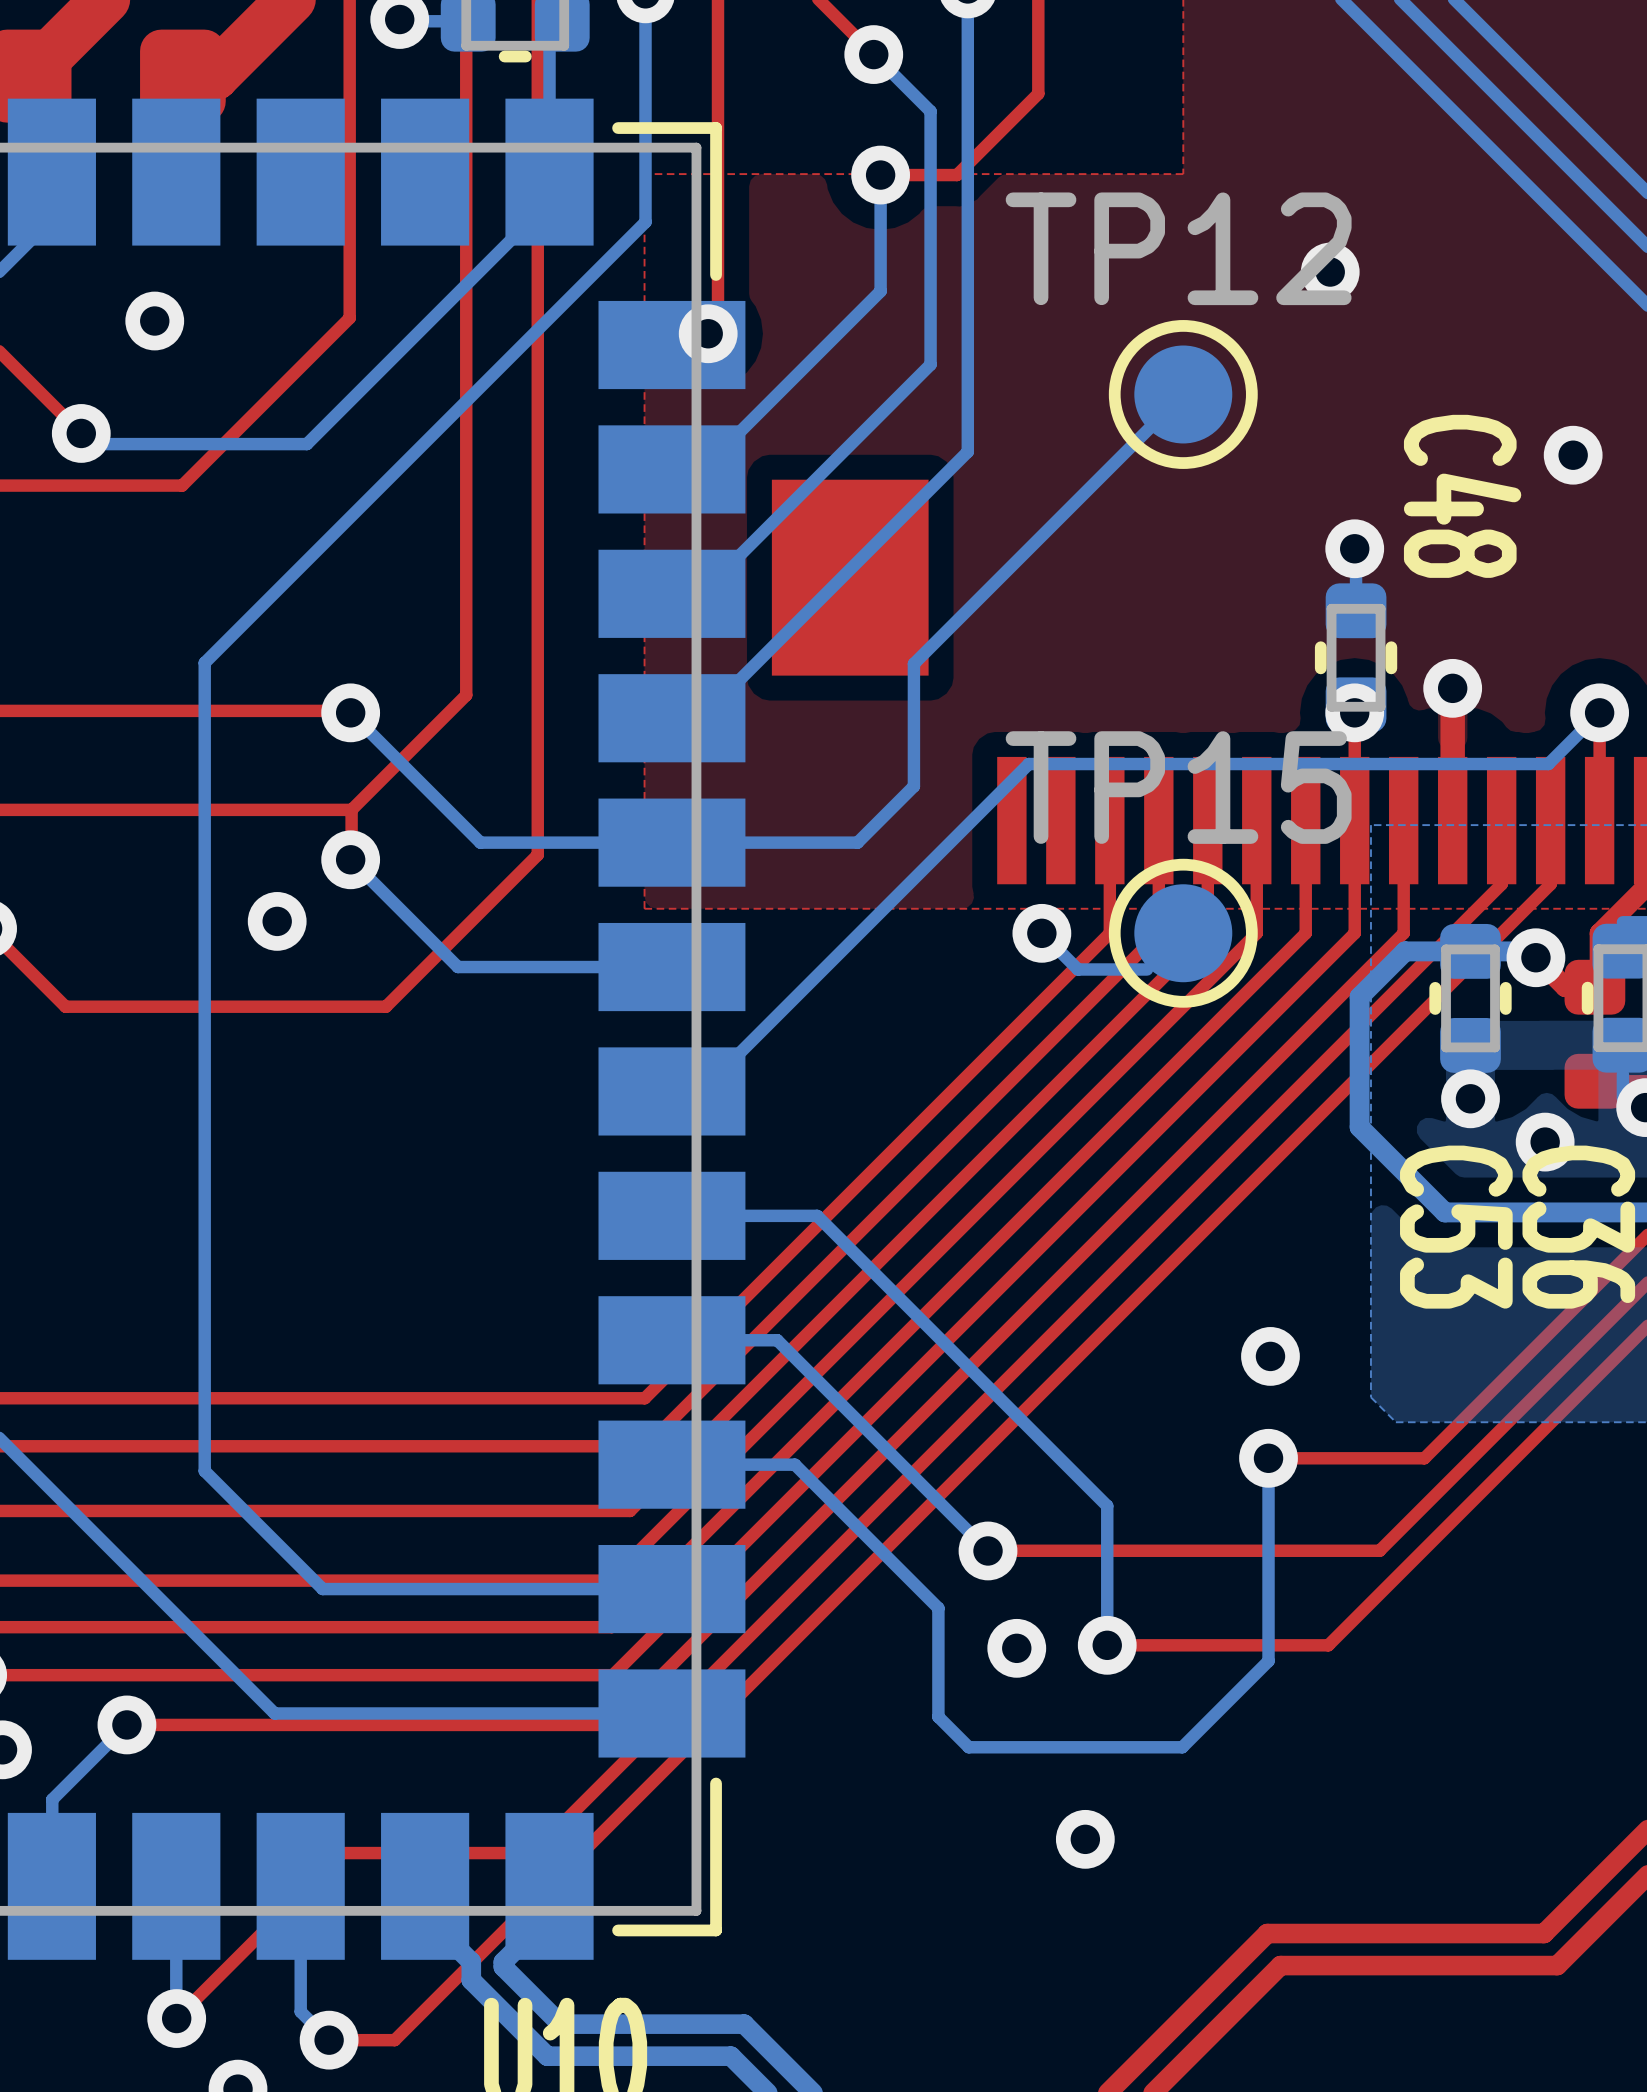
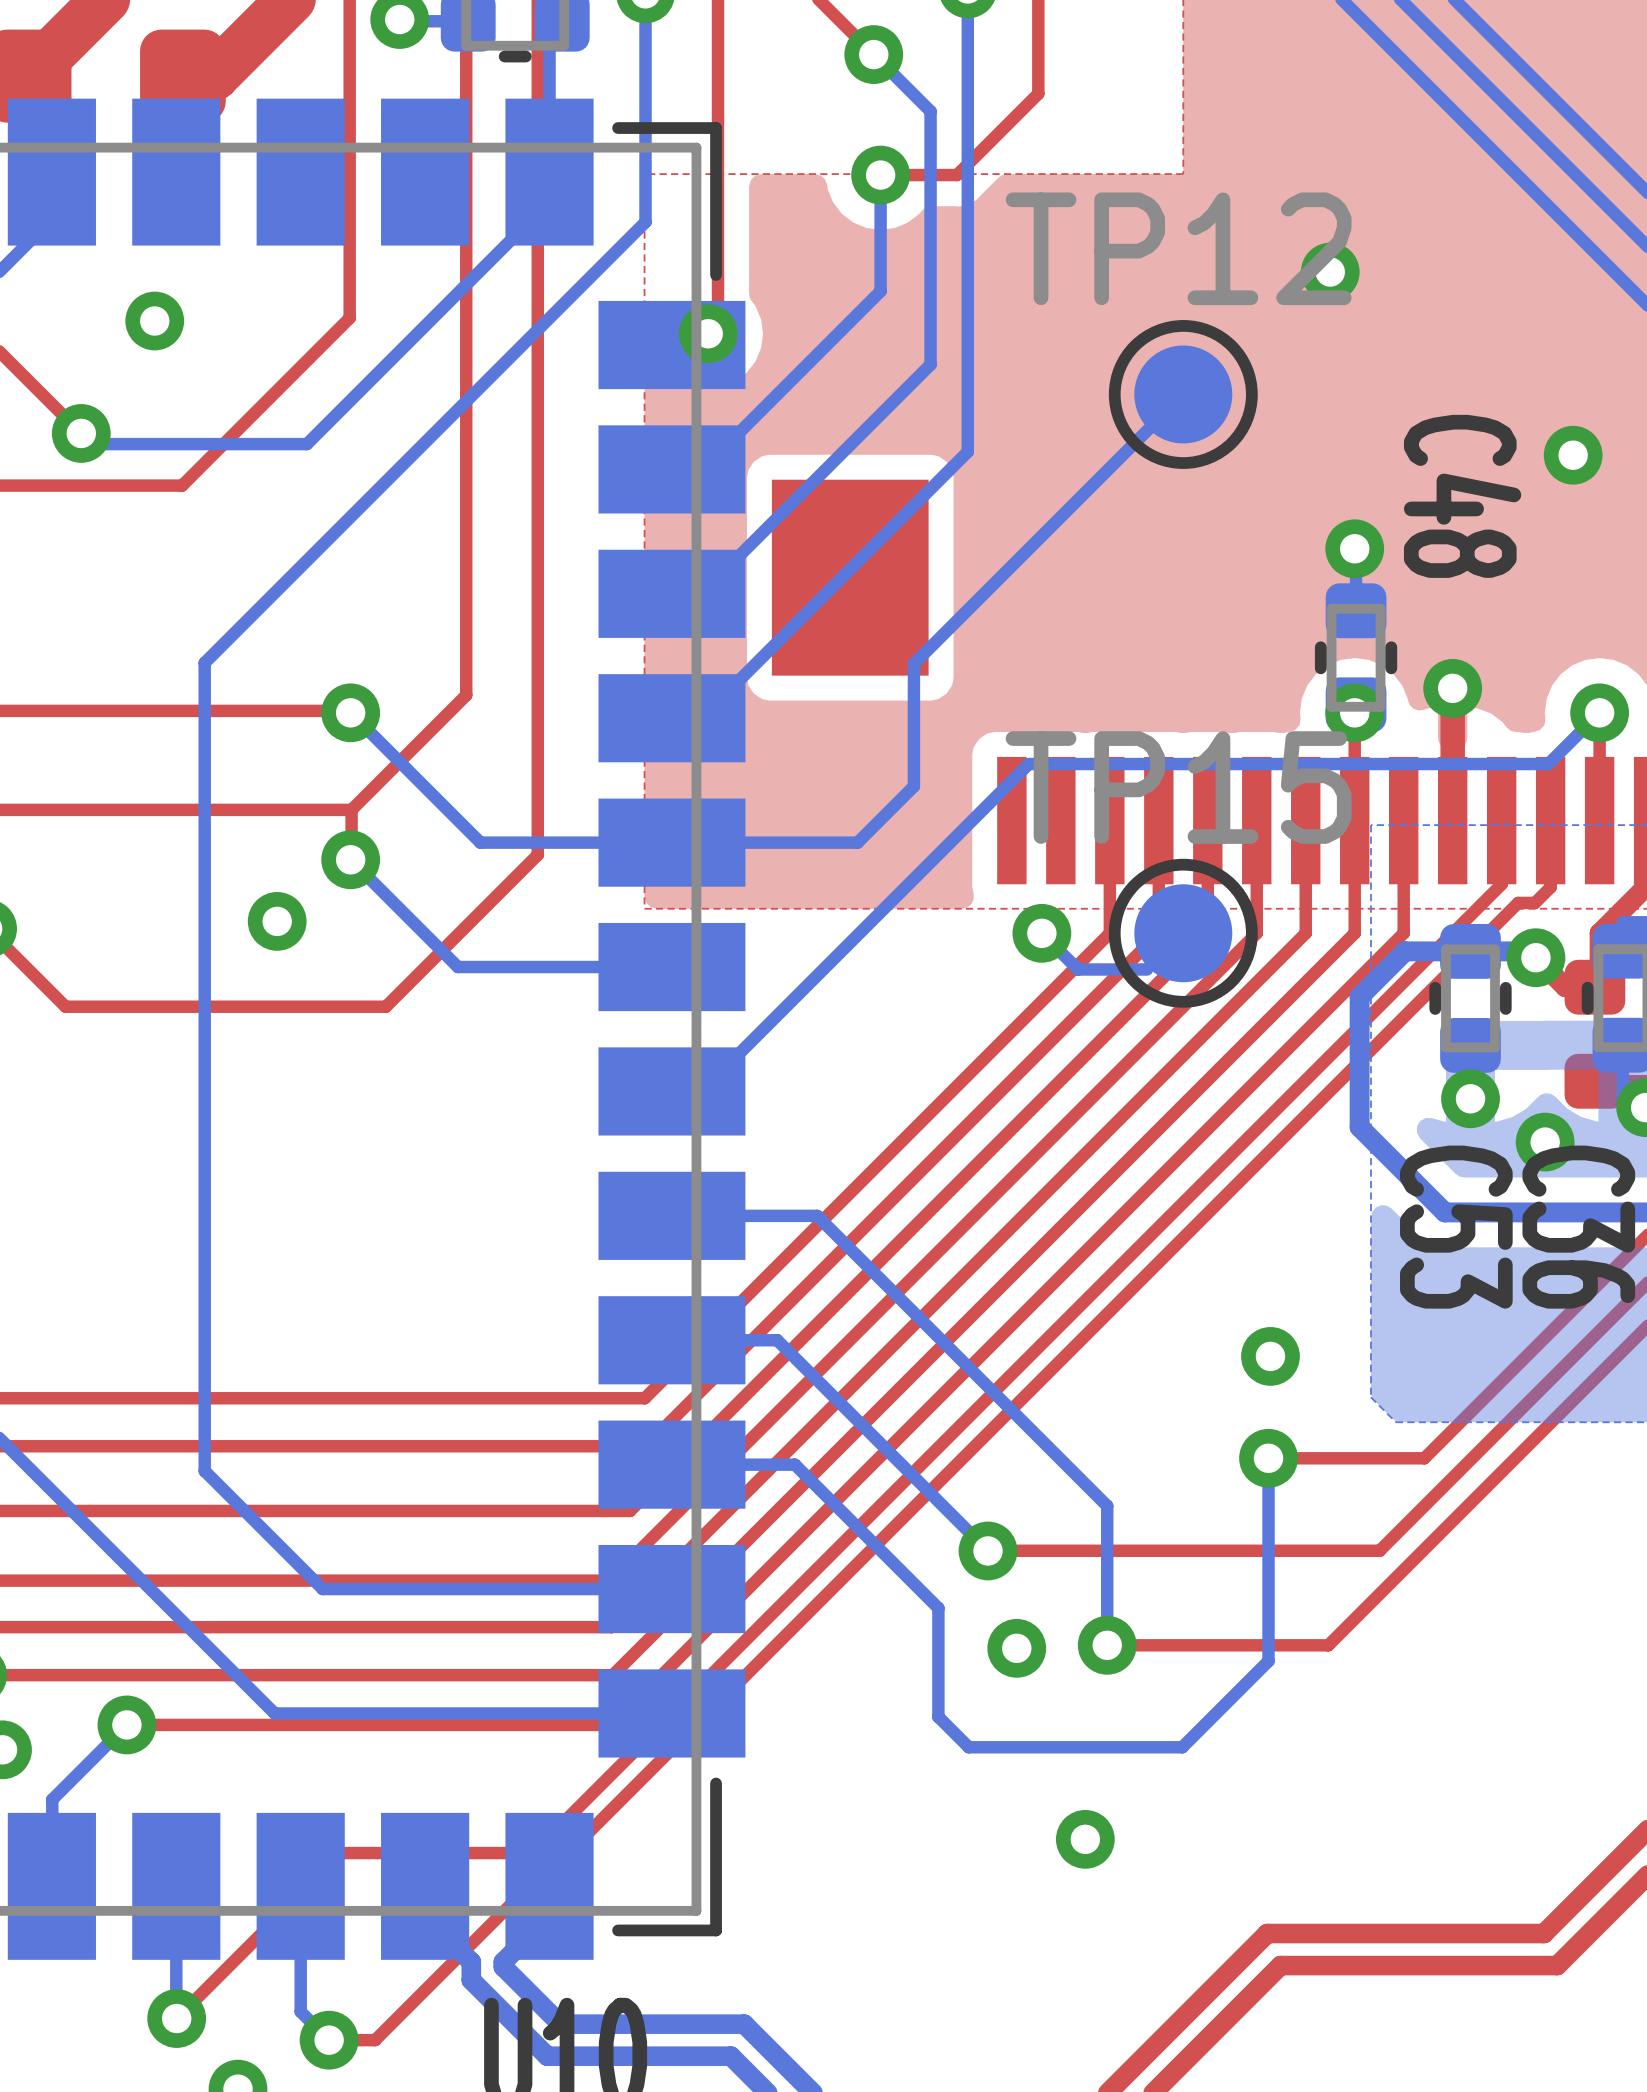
top track: (1550, 884) (394, 2040) (375, 2040) -> (1550, 884) (1550, 887) (1535, 902) (1518, 902) (543, 1877) (537, 1877) (375, 2040)

